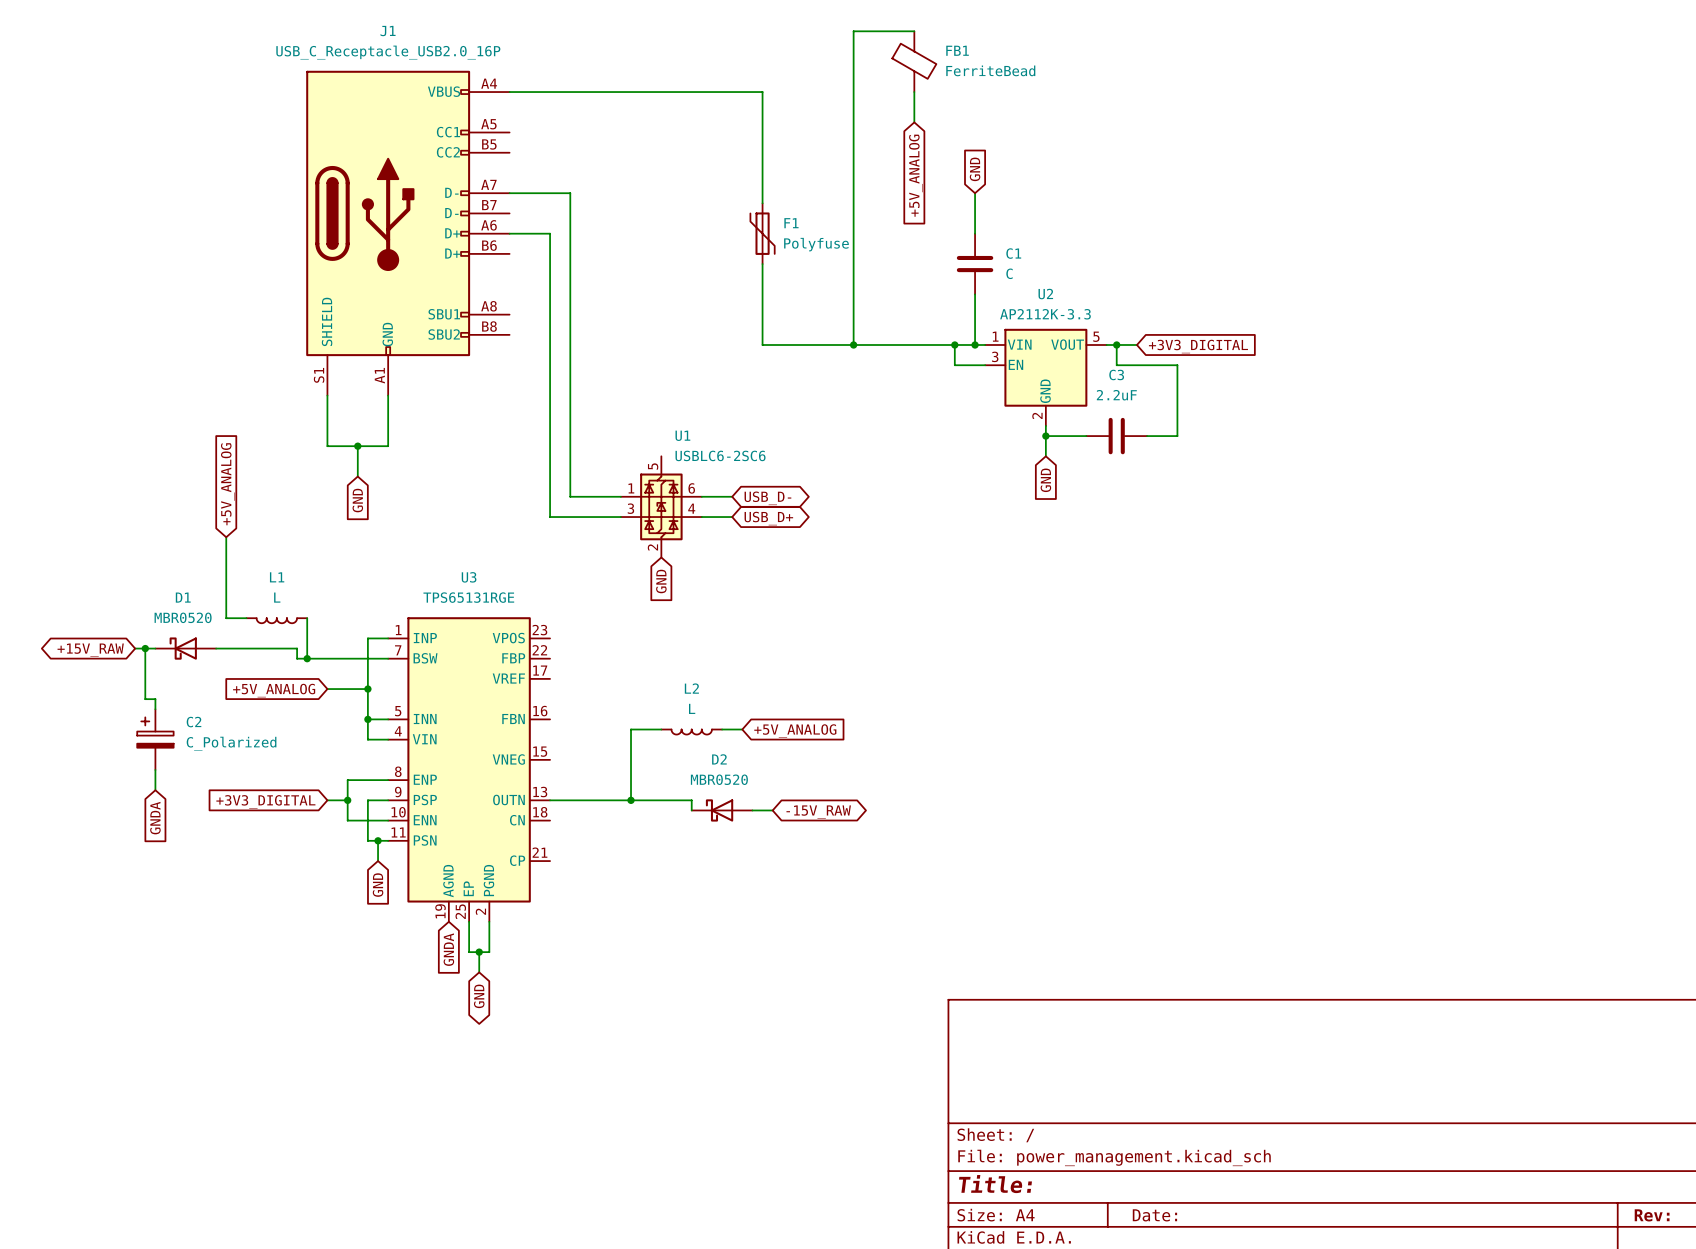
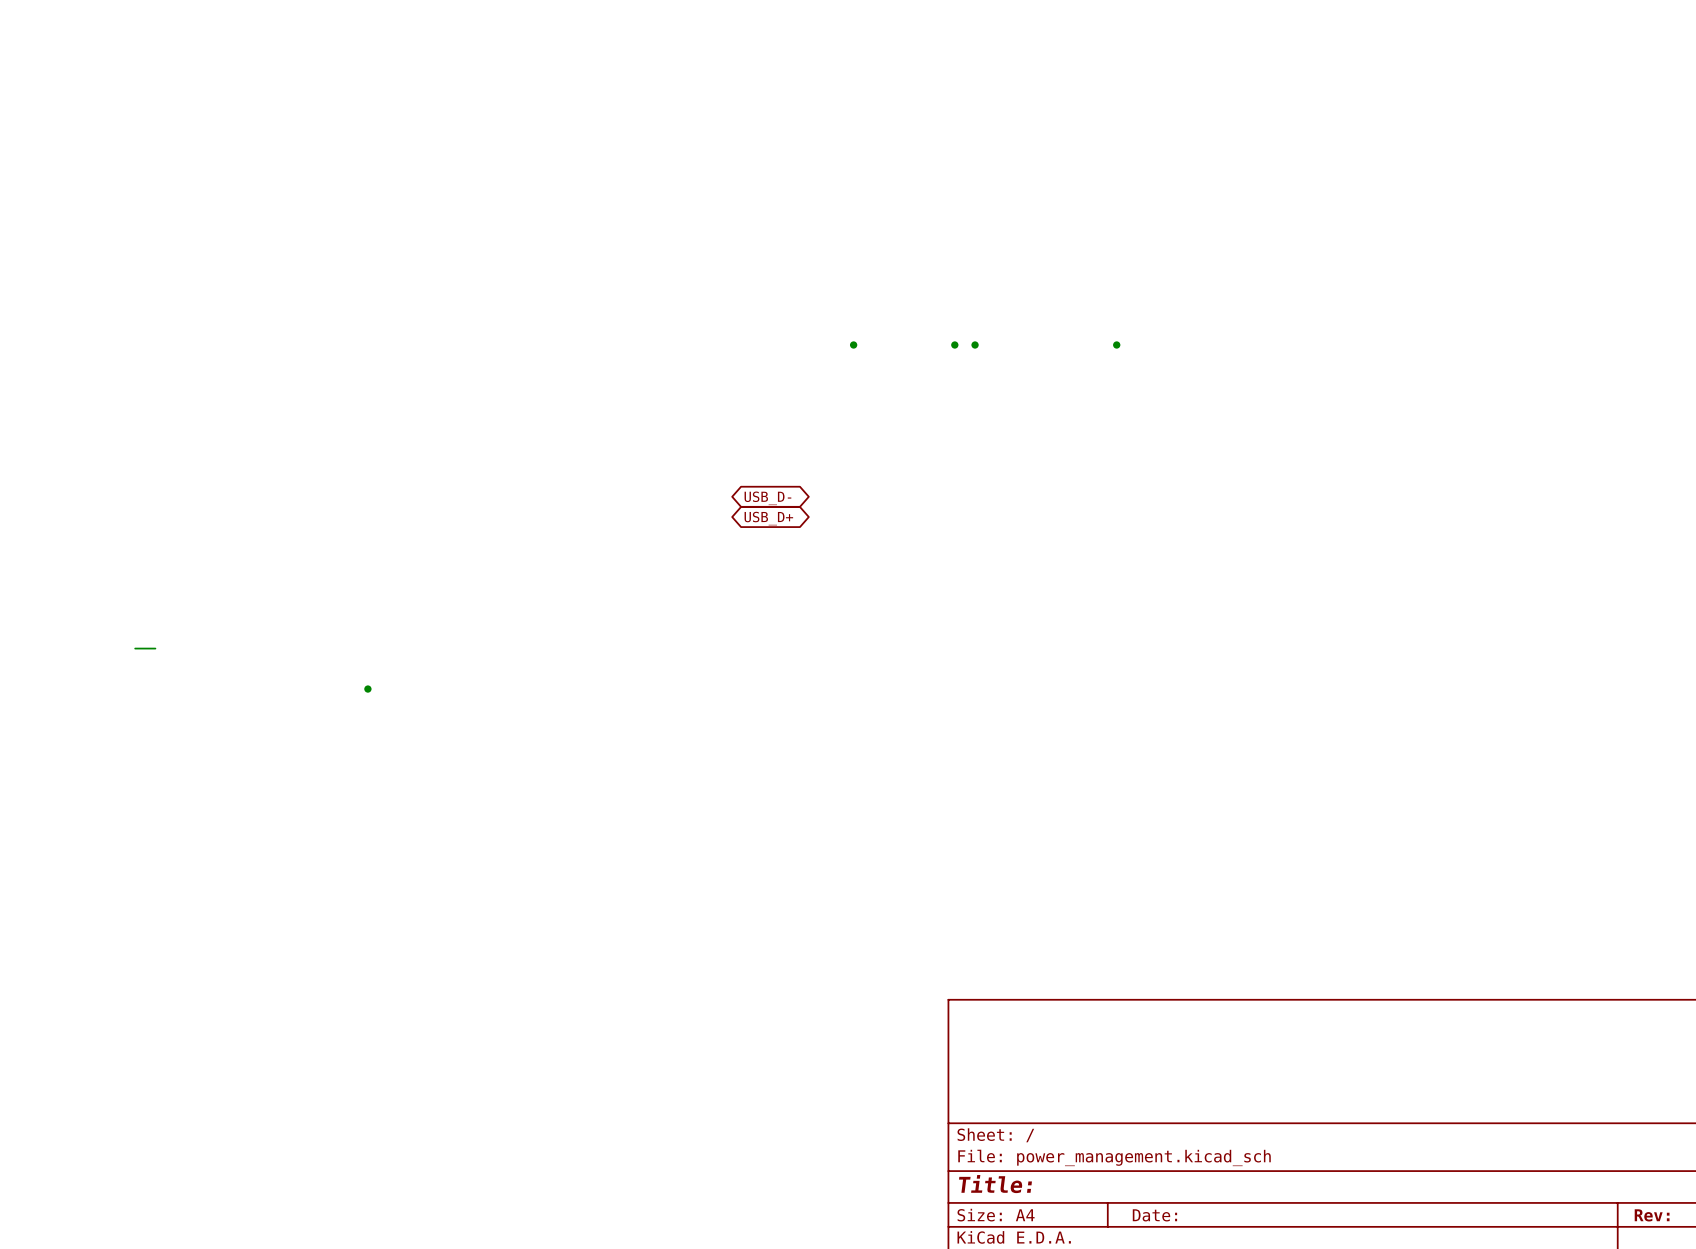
wire: (914, 31) (853, 31) (853, 344) -> none
FB1: FerriteBead (914, 61) -> none
wire: (509, 92) (762, 92) (762, 203) -> none
wire: (914, 92) (914, 122) -> none
global label: GND (975, 169) -> none
global label: +5V_ANALOG (915, 175) -> none
wire: (509, 193) (570, 193) (570, 496) (620, 496) -> none
wire: (975, 193) (975, 233) -> none
J1: USB_C_Receptacle_USB2.0_16P (407, 233) -> none
wire: (509, 233) (550, 233) (550, 517) (620, 517) -> none
F1: Polyfuse (762, 233) -> none
wire: (762, 264) (762, 344) (985, 344) -> none
C1: C (975, 264) -> none
wire: (975, 294) (975, 344) -> none
wire: (954, 344) (954, 365) (985, 365) -> none
wire: (1106, 344) (1136, 344) -> none
wire: (1116, 344) (1116, 365) (1177, 365) (1177, 436) (1147, 436) -> none
global label: +3V3_DIGITAL (1198, 346) -> none
U2: AP2112K-3.3 (1045, 377) -> none
wire: (327, 395) (327, 446) (388, 446) (388, 395) -> none
wire: (1045, 425) (1045, 456) -> none
wire: (1045, 436) (1086, 436) -> none
junction: (1045, 436) -> none
C3: 2.2uF (1116, 436) -> none
wire: (357, 446) (357, 476) -> none
junction: (357, 446) -> none
global label: GND (1045, 480) -> none
global label: +5V_ANALOG (227, 484) -> none
wire: (701, 496) (732, 496) -> none
global label: GND (357, 500) -> none
U1: USBLC6-2SC6 (661, 506) -> none
wire: (701, 517) (732, 517) -> none
wire: (226, 537) (226, 618) (246, 618) -> none
global label: GND (661, 581) -> none
wire: (307, 618) (307, 658) -> none
L1: L (276, 620) -> none
wire: (388, 638) (367, 638) (367, 739) (388, 739) -> none
wire: (145, 648) (145, 699) (155, 699) (155, 709) -> none
junction: (145, 648) -> none
D1: MBR0520 (185, 648) -> none
wire: (216, 648) (297, 648) (297, 658) (388, 658) -> none
global label: +15V_RAW (90, 650) -> none
junction: (307, 658) -> none
wire: (327, 689) (367, 689) -> none
global label: +5V_ANALOG (274, 690) -> none
wire: (367, 719) (388, 719) -> none
junction: (367, 719) -> none
wire: (661, 729) (631, 729) (631, 800) -> none
wire: (722, 729) (742, 729) -> none
global label: +5V_ANALOG (795, 731) -> none
L2: L (691, 732) -> none
C2: C_Polarized (155, 739) -> none
wire: (155, 769) (155, 790) -> none
U3: TPS65131RGE (469, 769) -> none
wire: (388, 780) (347, 780) (347, 820) (388, 820) -> none
wire: (327, 800) (347, 800) -> none
junction: (347, 800) -> none
wire: (388, 800) (367, 800) (367, 840) (388, 840) -> none
wire: (550, 800) (691, 800) (691, 810) -> none
junction: (631, 800) -> none
global label: +3V3_DIGITAL (265, 801) -> none
D2: MBR0520 (722, 810) -> none
wire: (752, 810) (772, 810) -> none
global label: -15V_RAW (818, 812) -> none
global label: GNDA (155, 818) -> none
wire: (378, 840) (378, 861) -> none
junction: (378, 840) -> none
global label: GND (378, 885) -> none
wire: (469, 921) (469, 952) (489, 952) (489, 921) -> none
global label: GNDA (448, 949) -> none
wire: (479, 952) (479, 972) -> none
junction: (479, 952) -> none
global label: GND (479, 996) -> none

